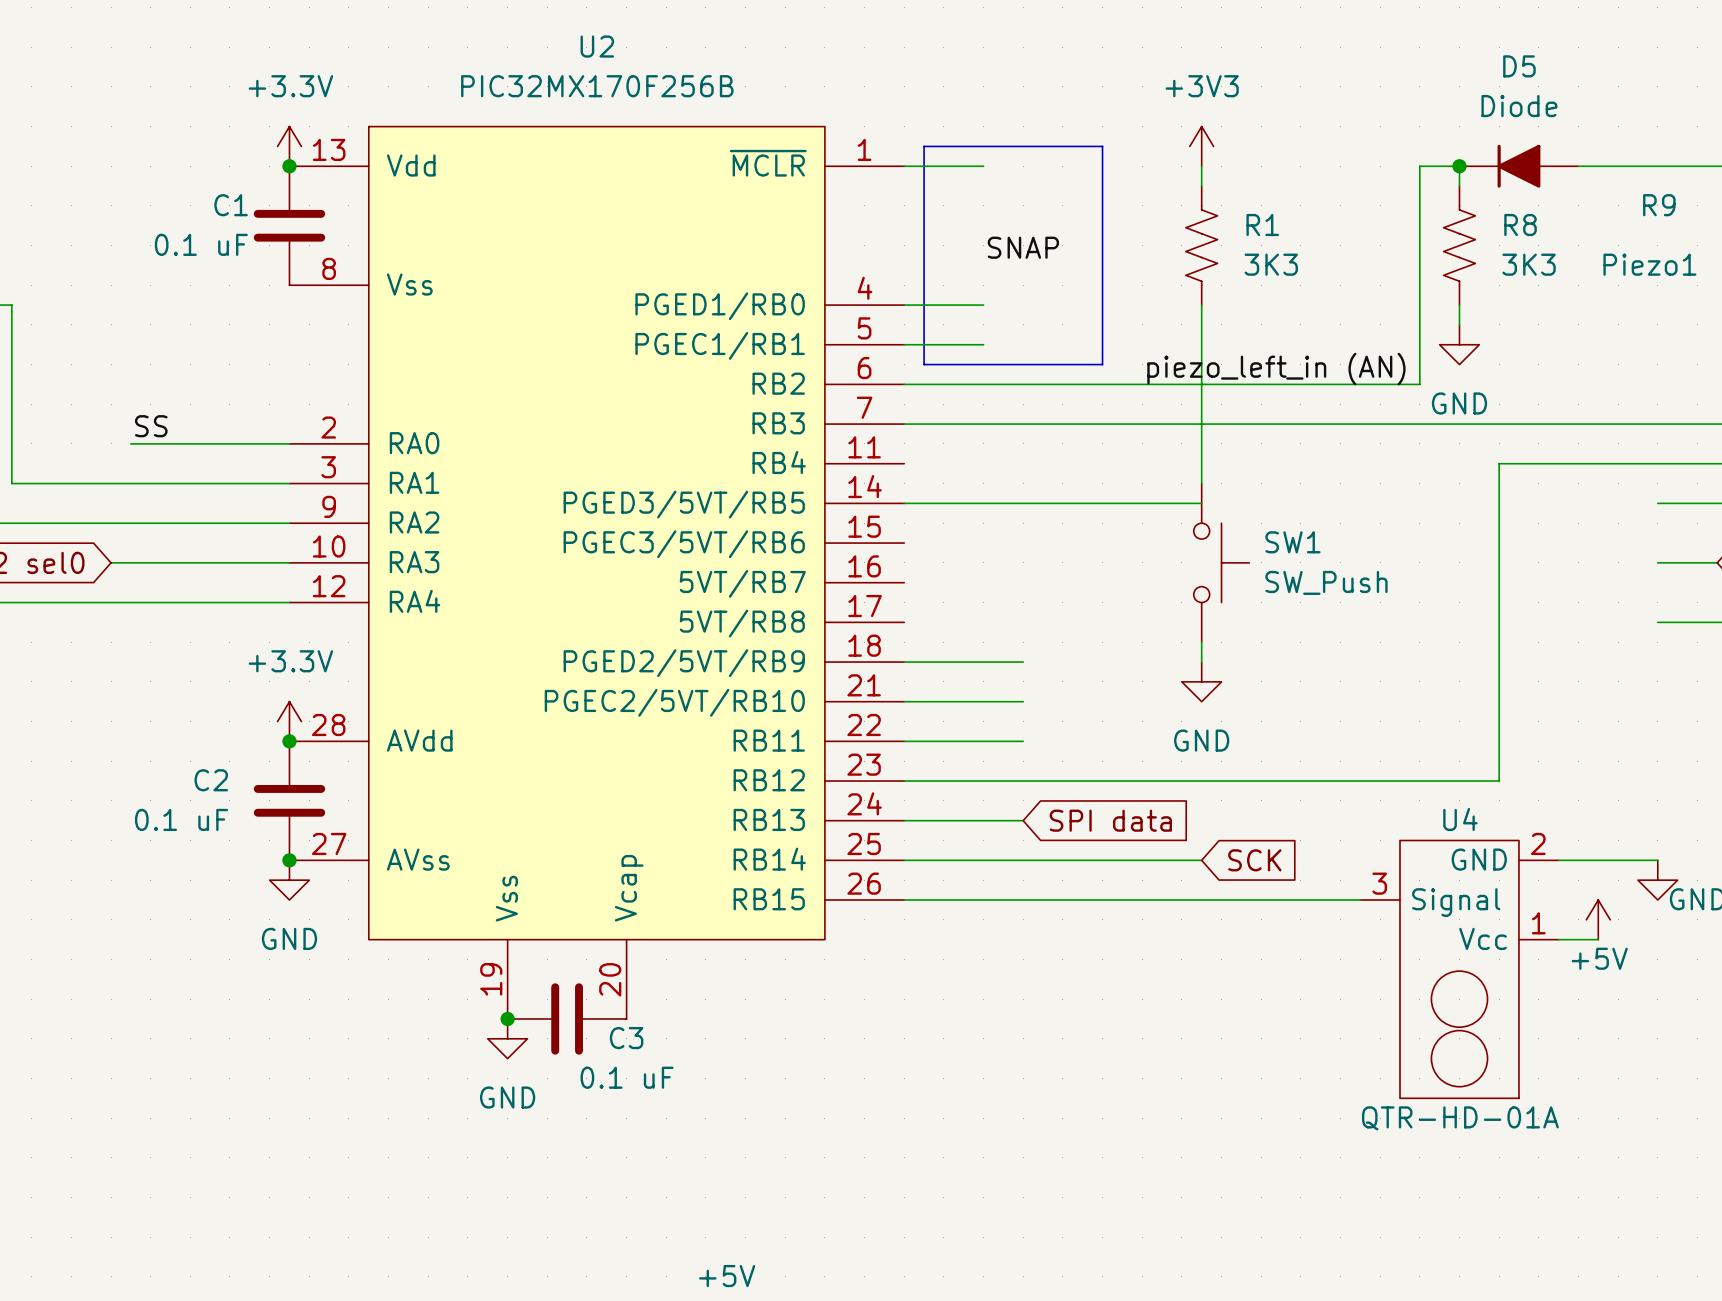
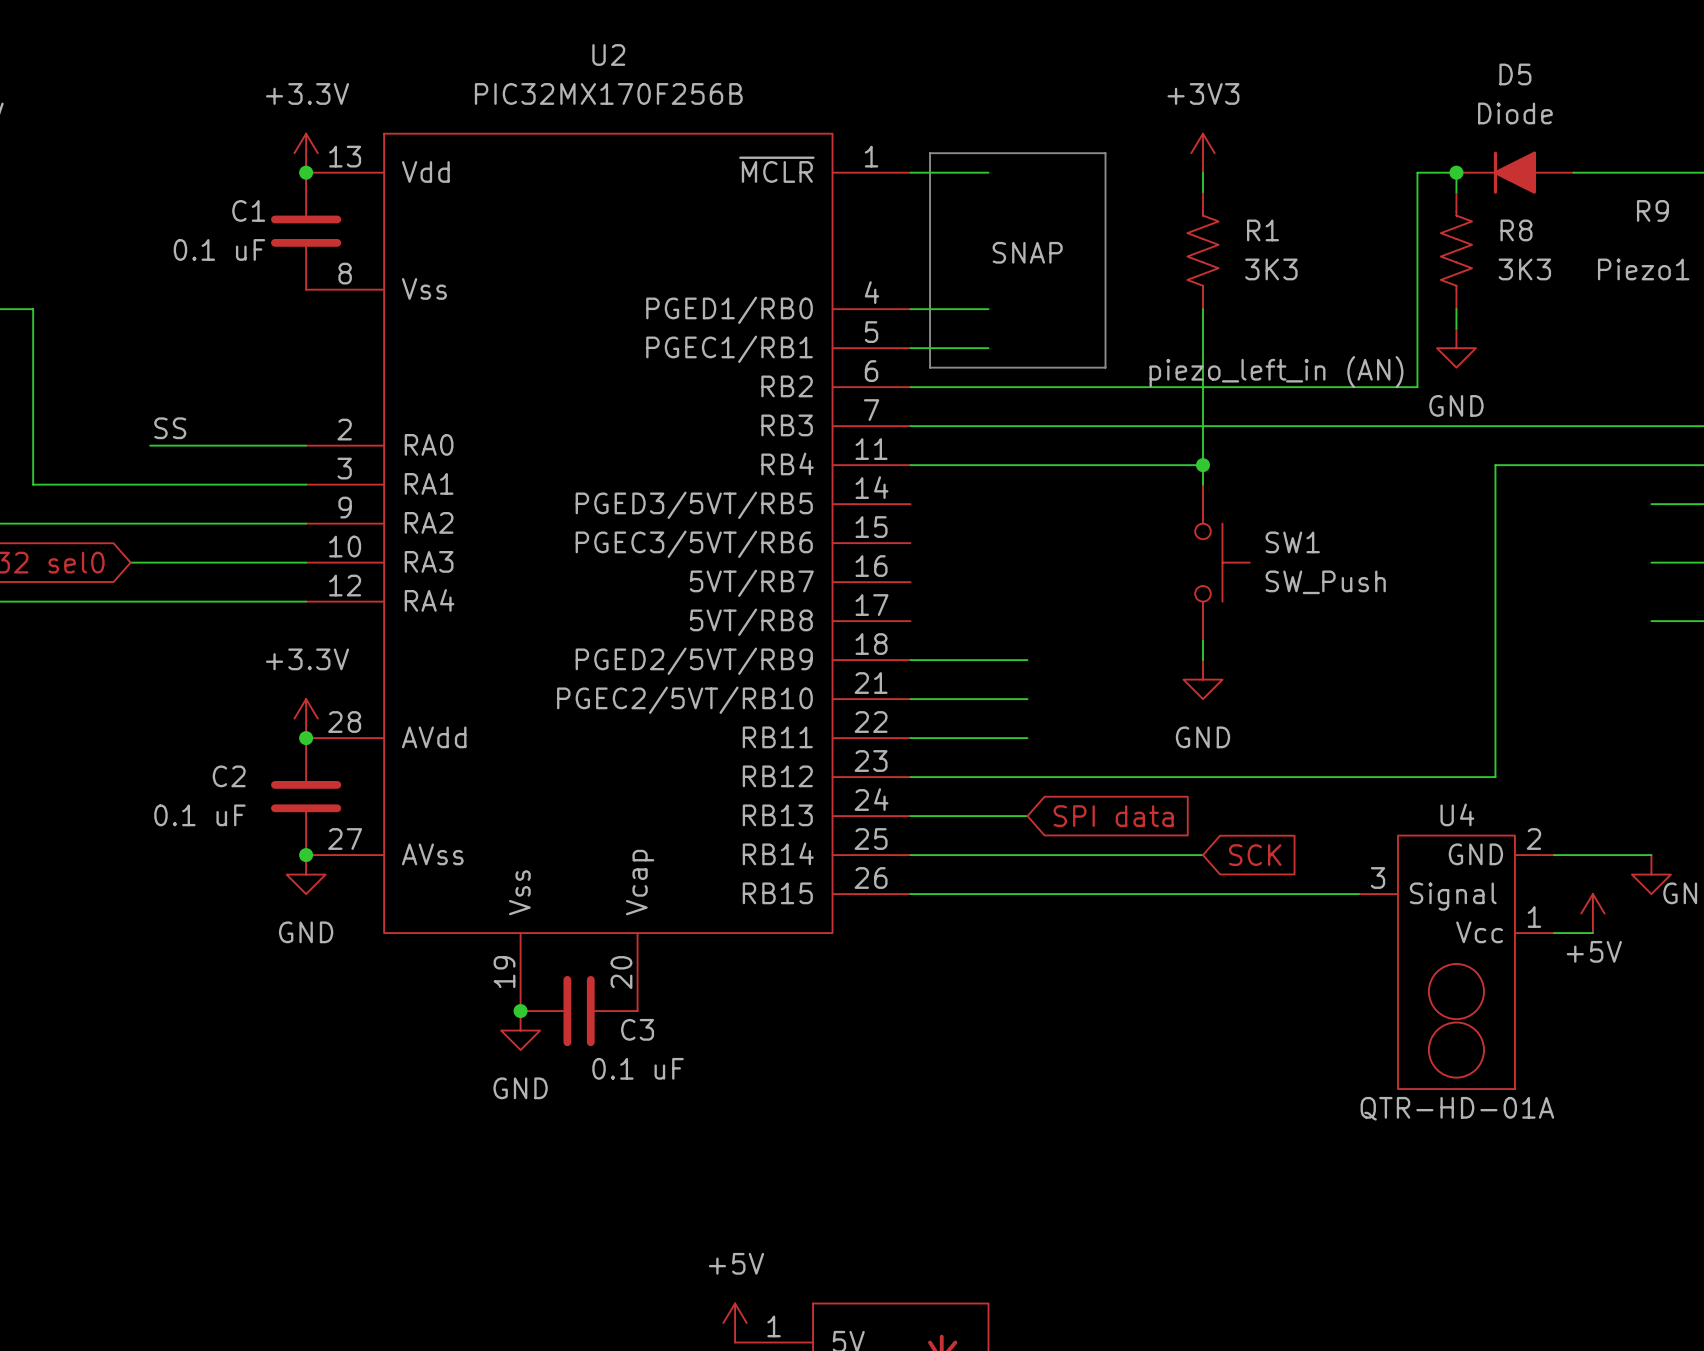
junction: none -> (1202, 465)
wire: (904, 503) (1201, 503) -> (910, 465) (1202, 465)

